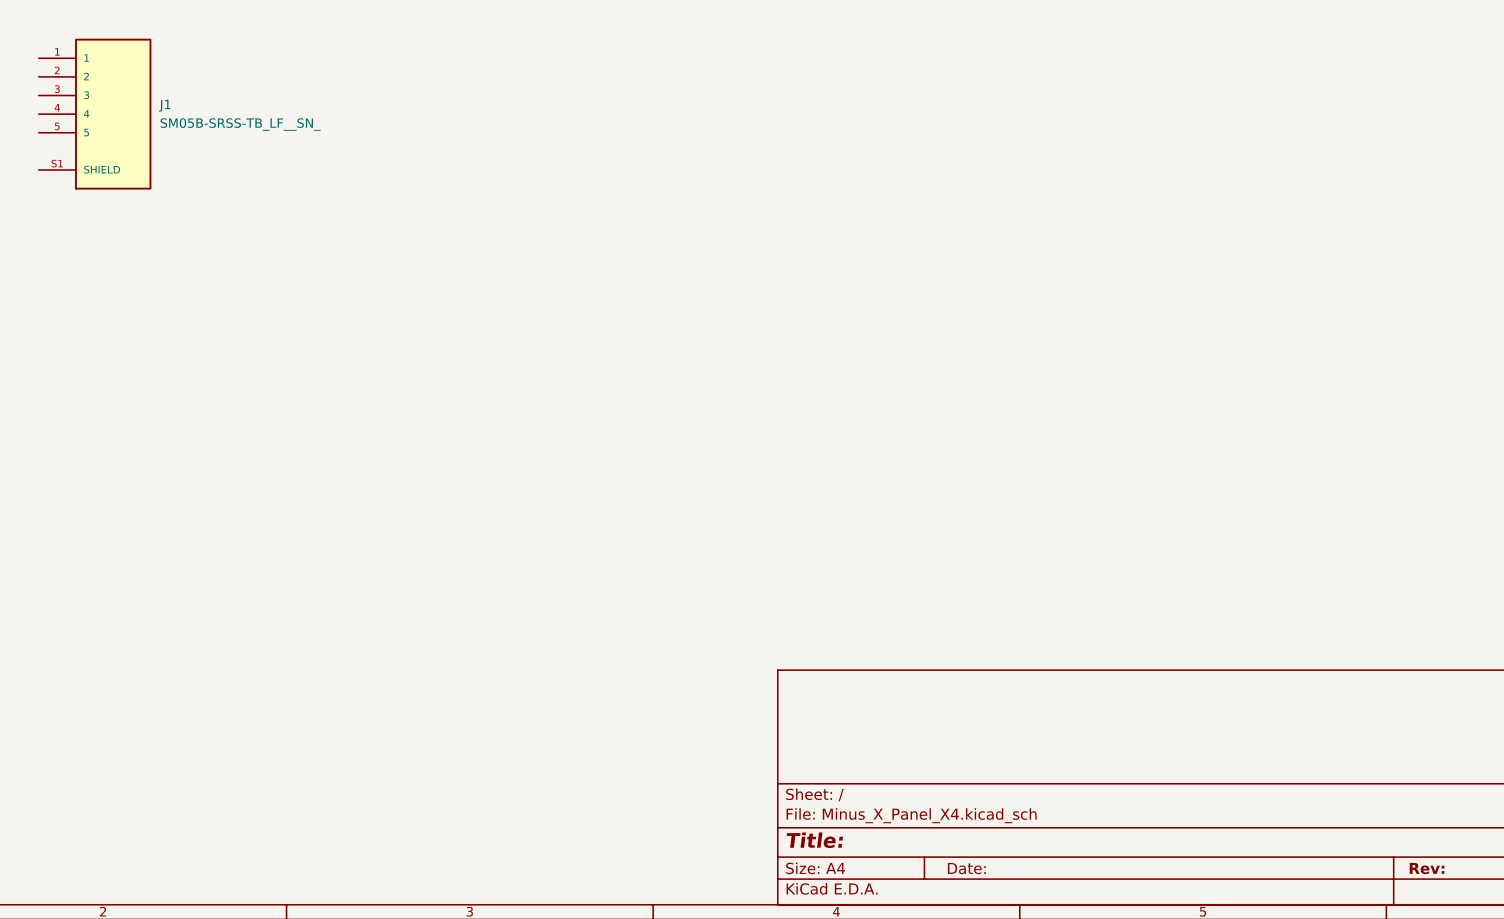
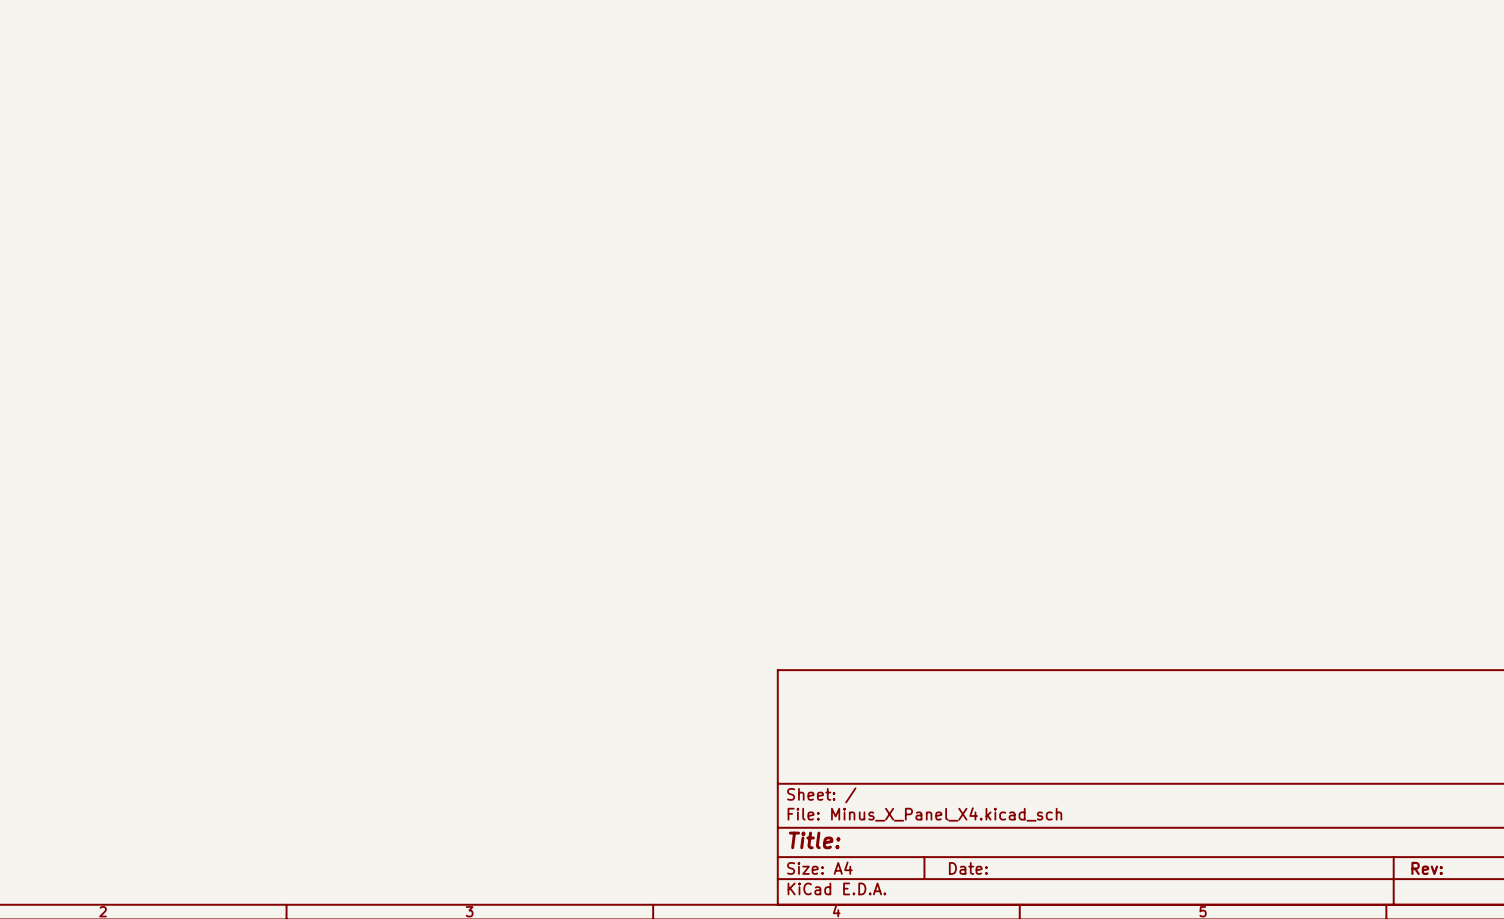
J1: SM05B-SRSS-TB_LF__SN_ (95, 114) -> none

